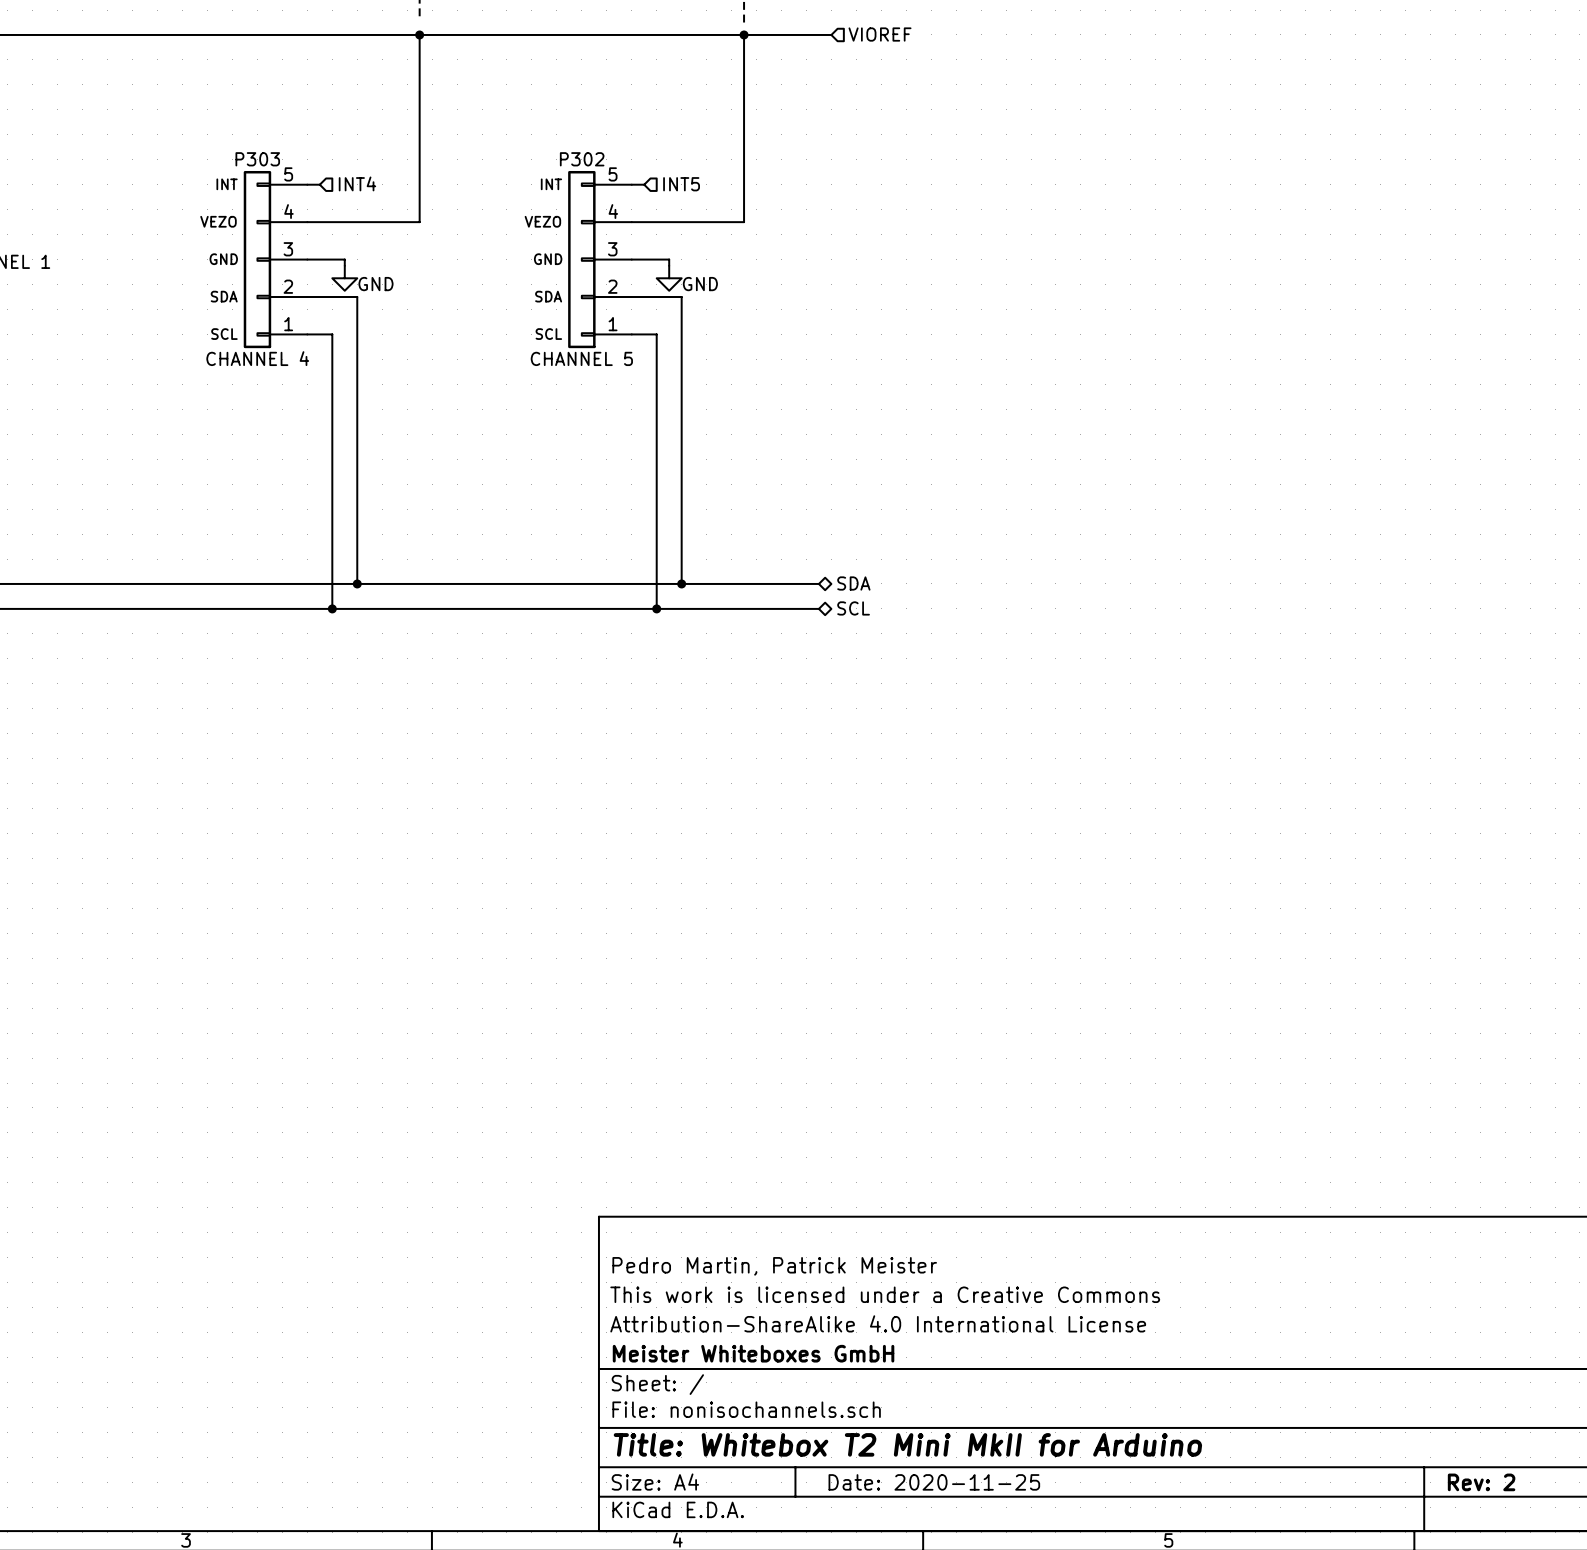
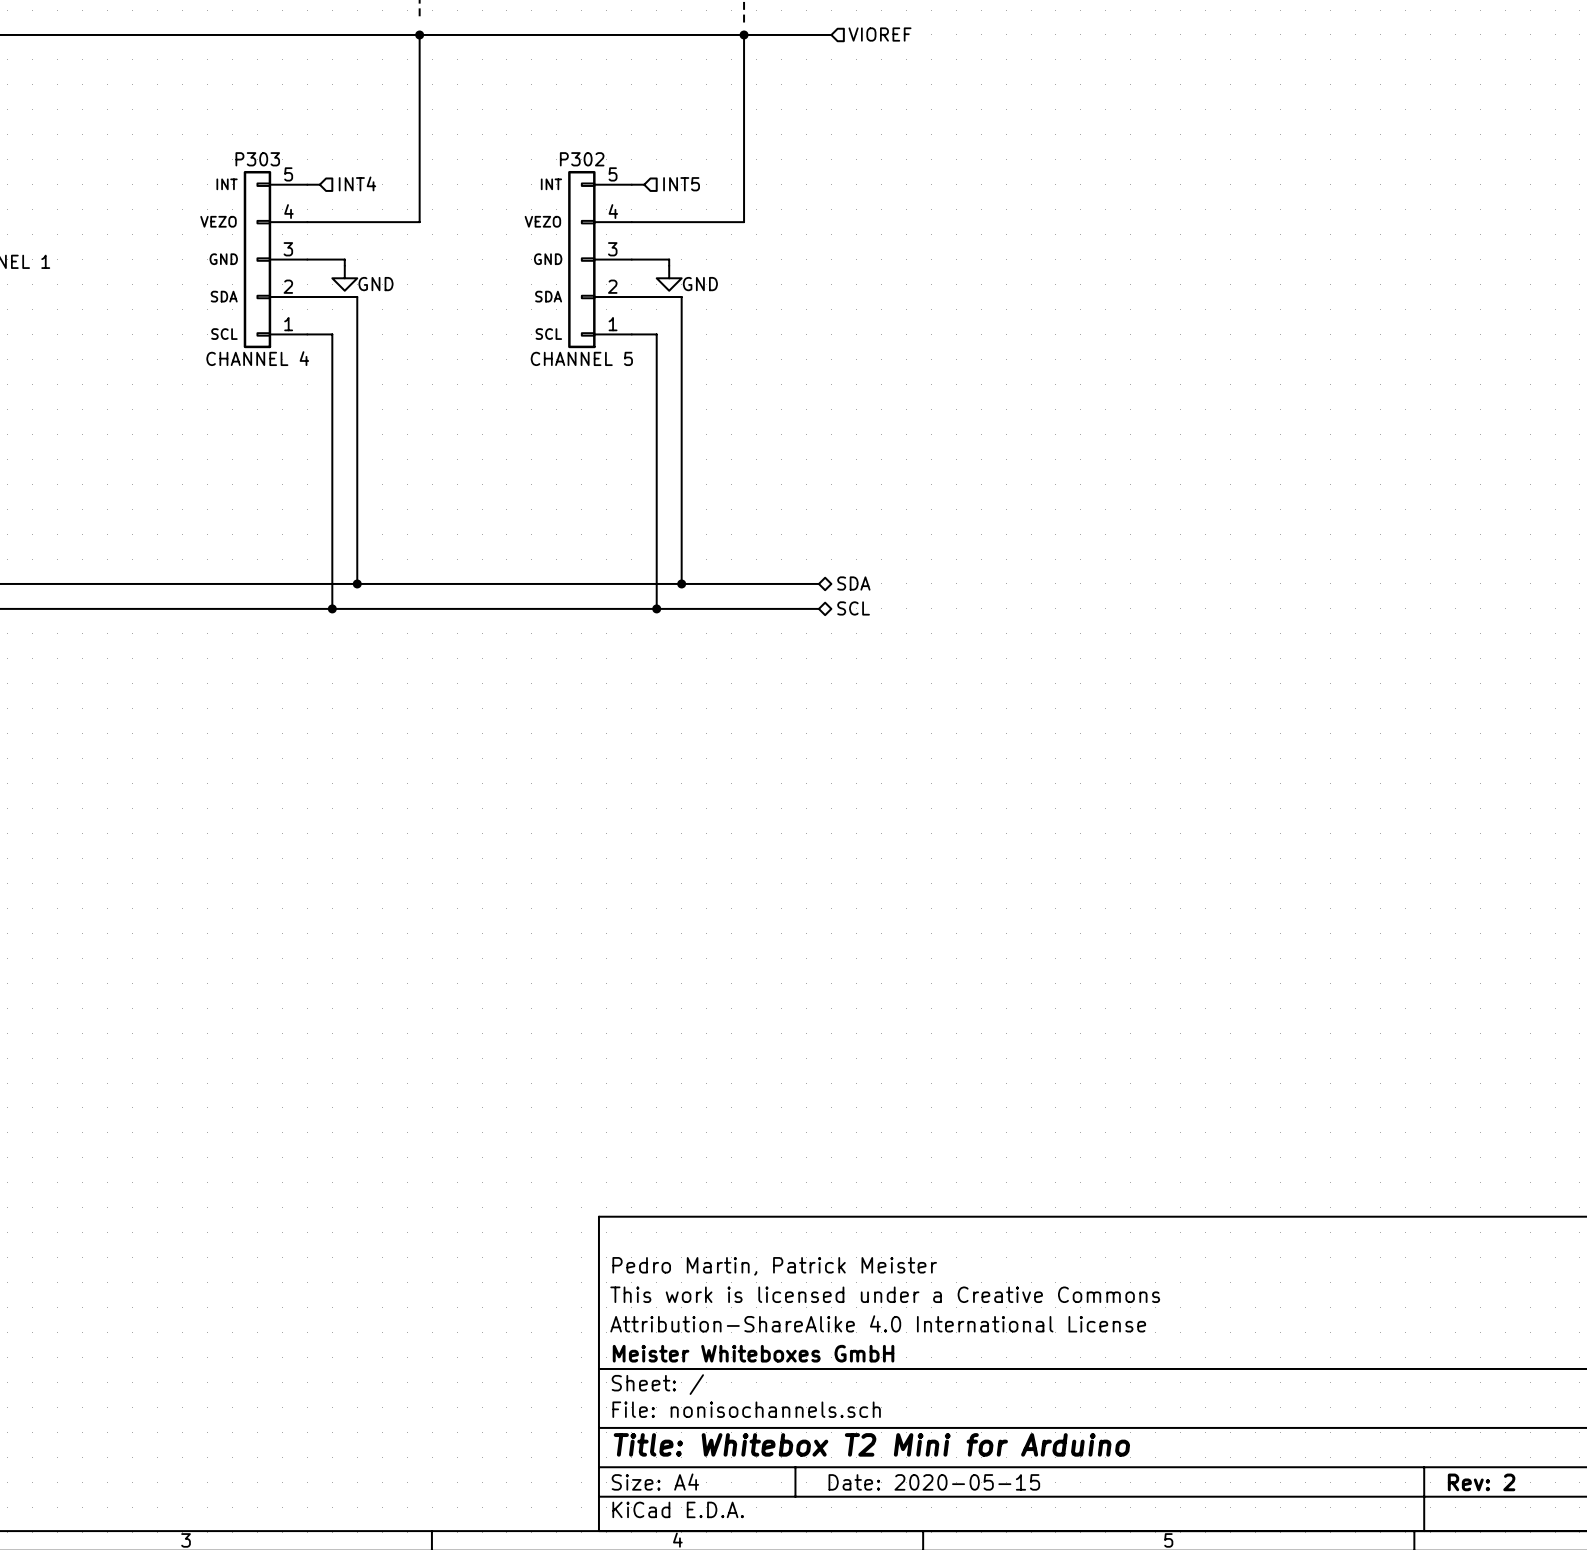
title block: Title: Whitebox T2 Mini MkII for Arduino (907, 1444) -> Title: Whitebox T2 Mini for Arduino (871, 1444)
title block: Date: 2020-11-25 (934, 1482) -> Date: 2020-05-15 (934, 1482)

